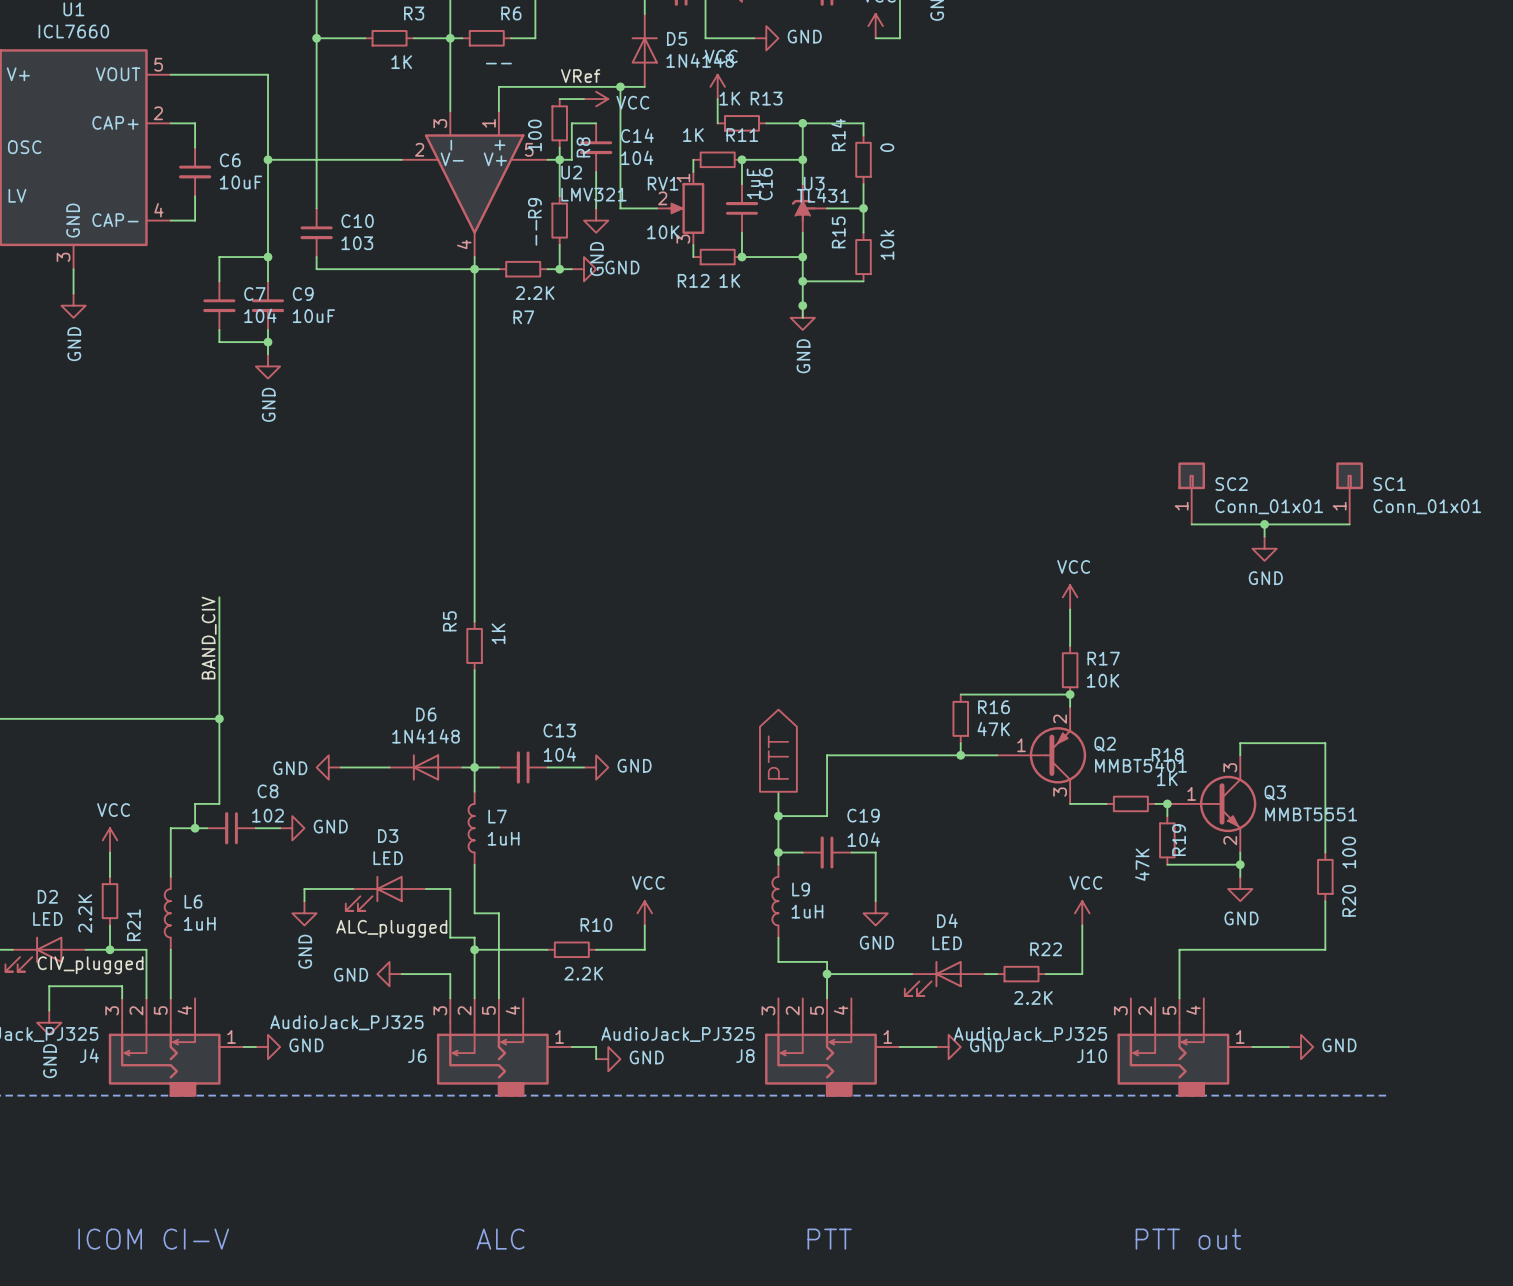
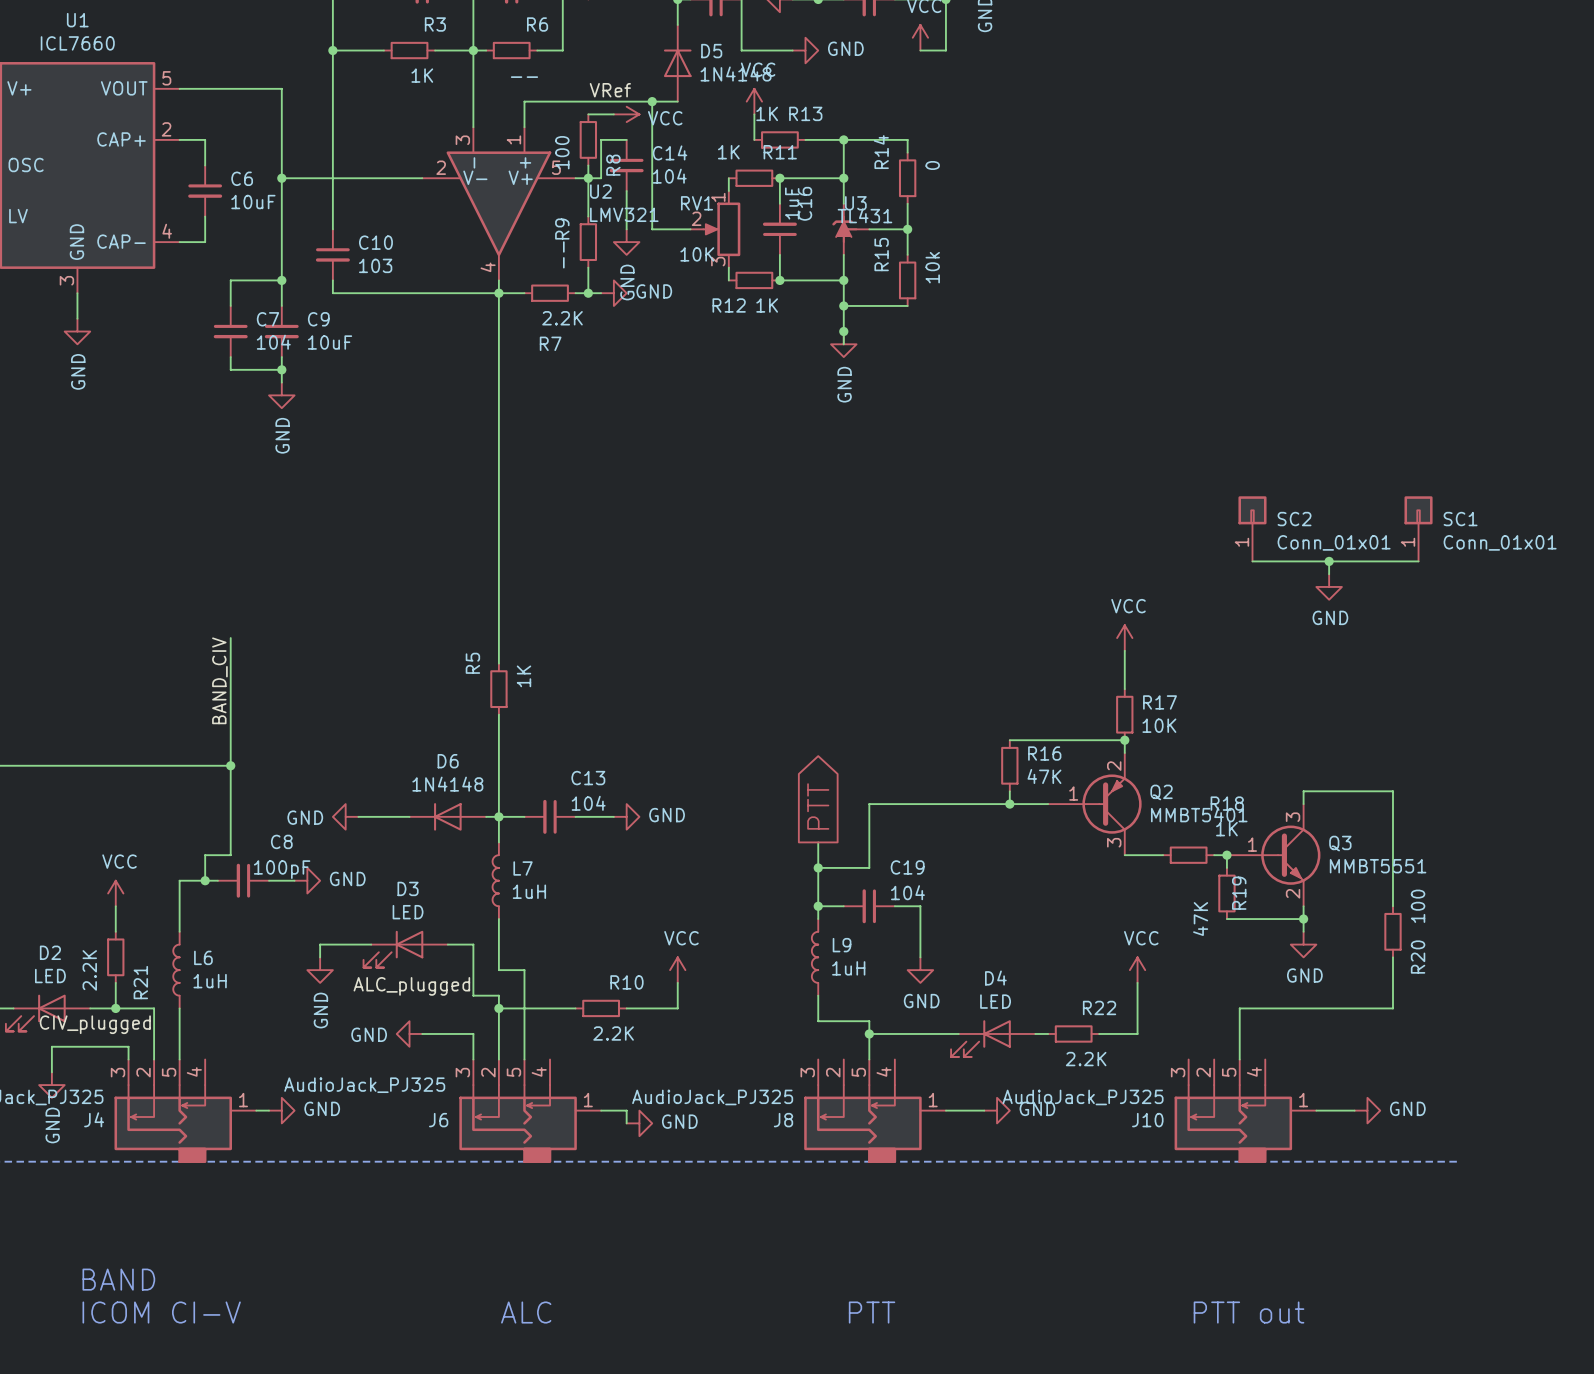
C8 value: 102 (268, 815) -> 100pF (282, 869)
text: none -> BAND (118, 1279)

